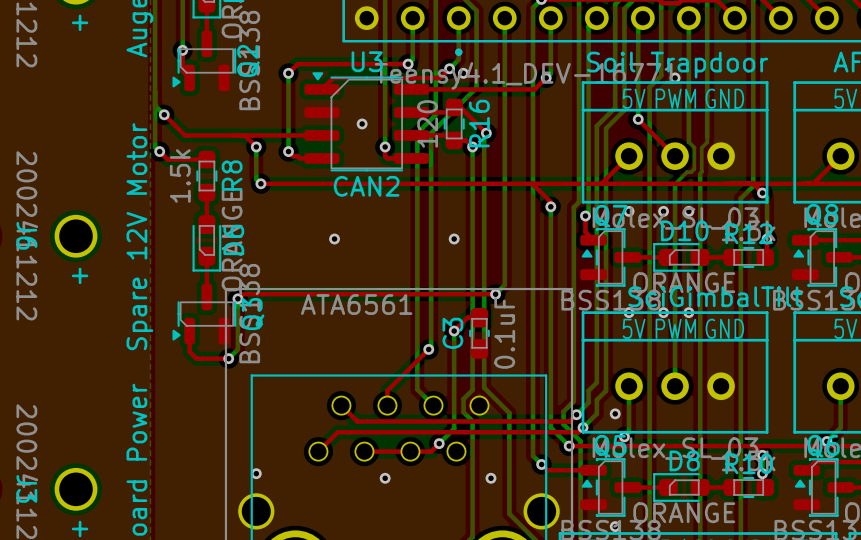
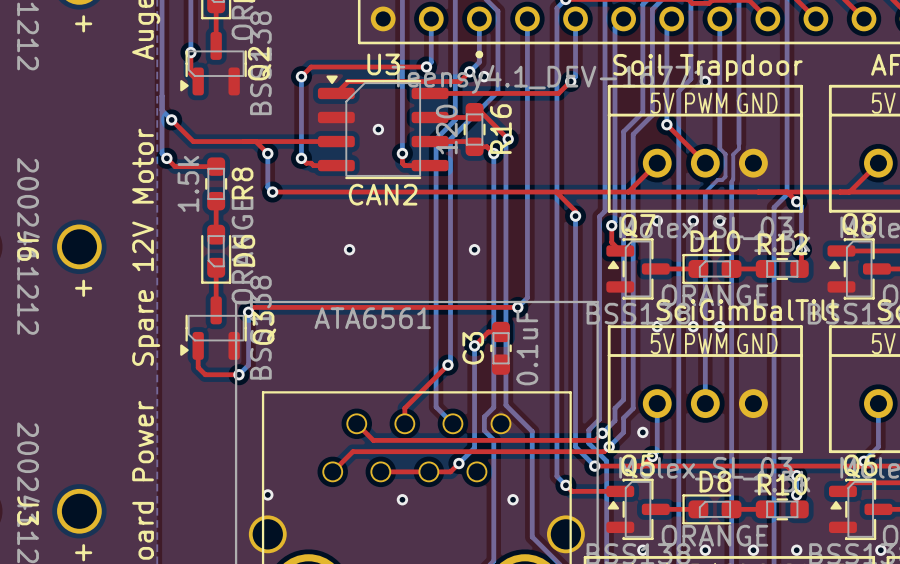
via: none -> (705, 550)
via: none -> (753, 550)
via: none -> (796, 550)
via: none -> (880, 550)

